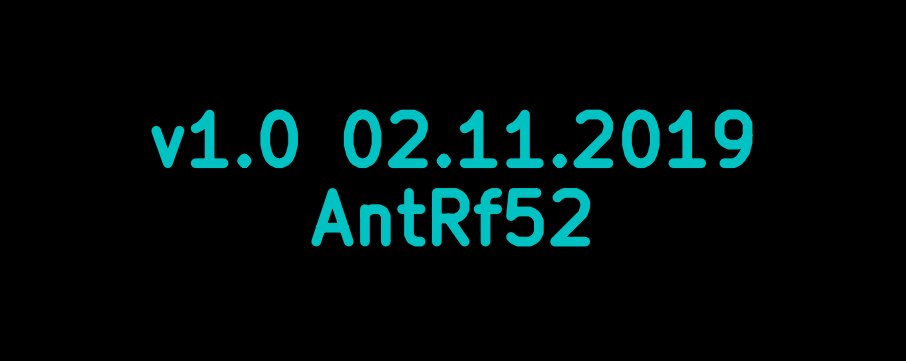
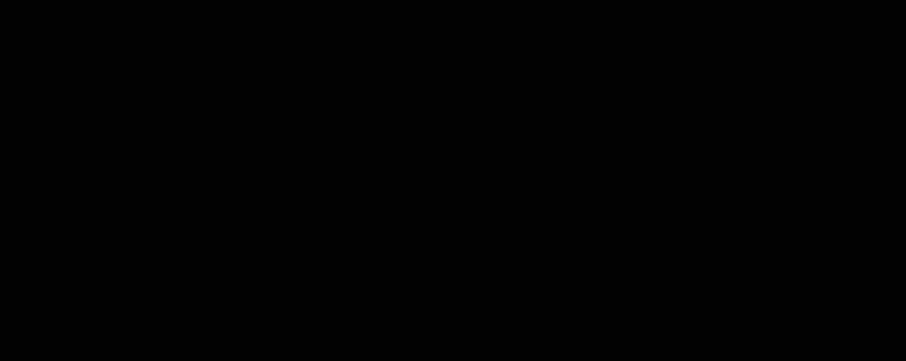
text: v1.0 02.11.2019 (451, 138) -> none
text: AntRf52 (450, 217) -> none

